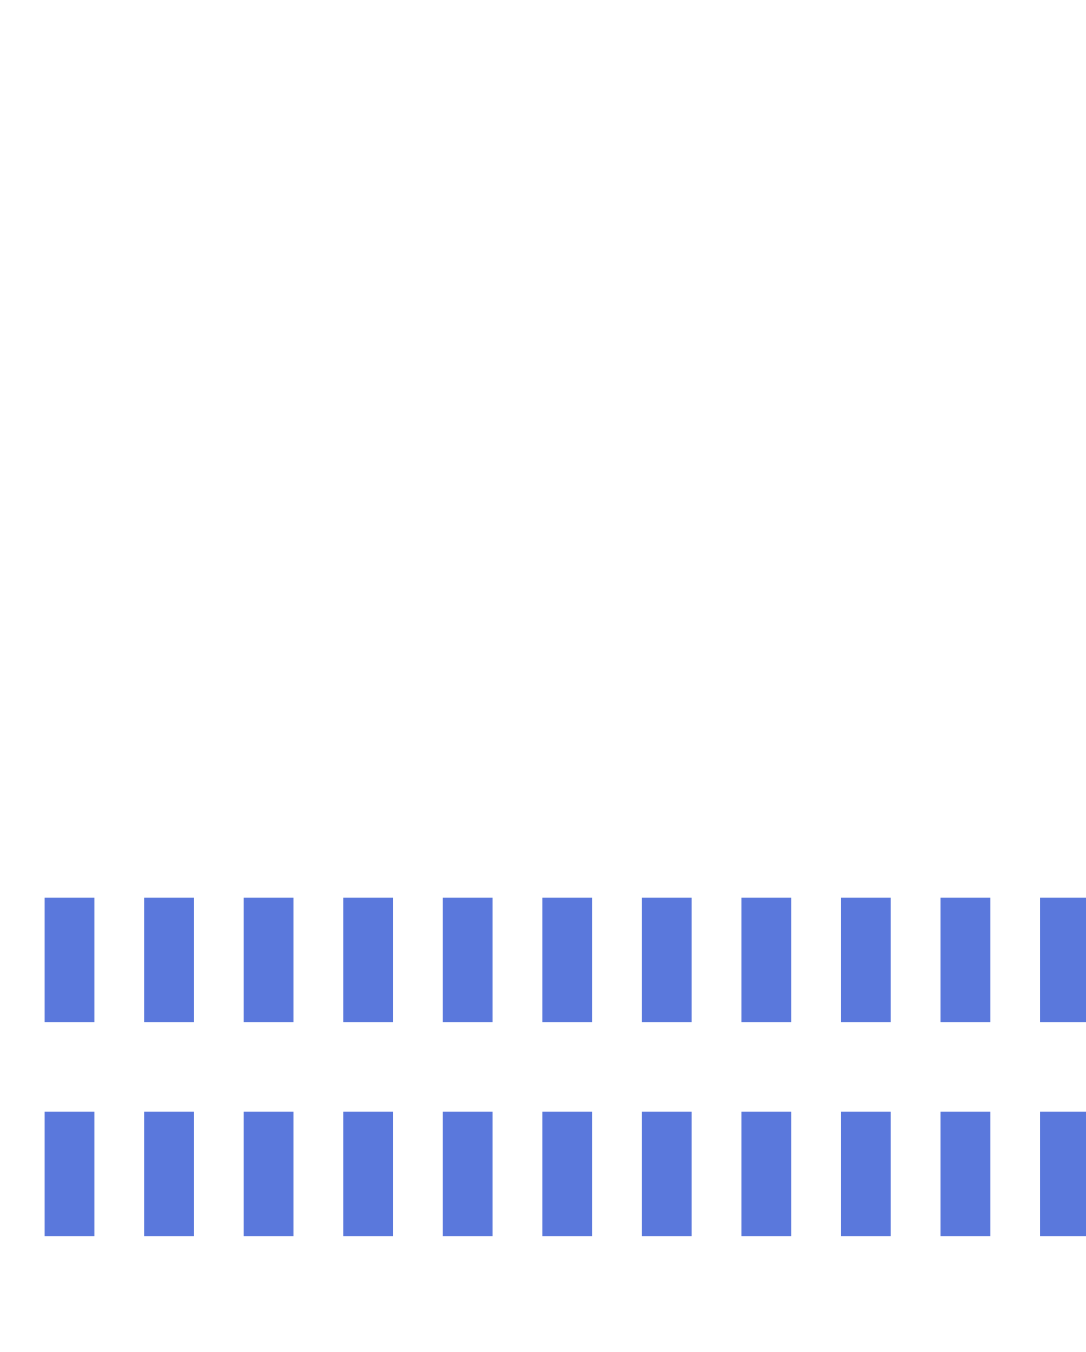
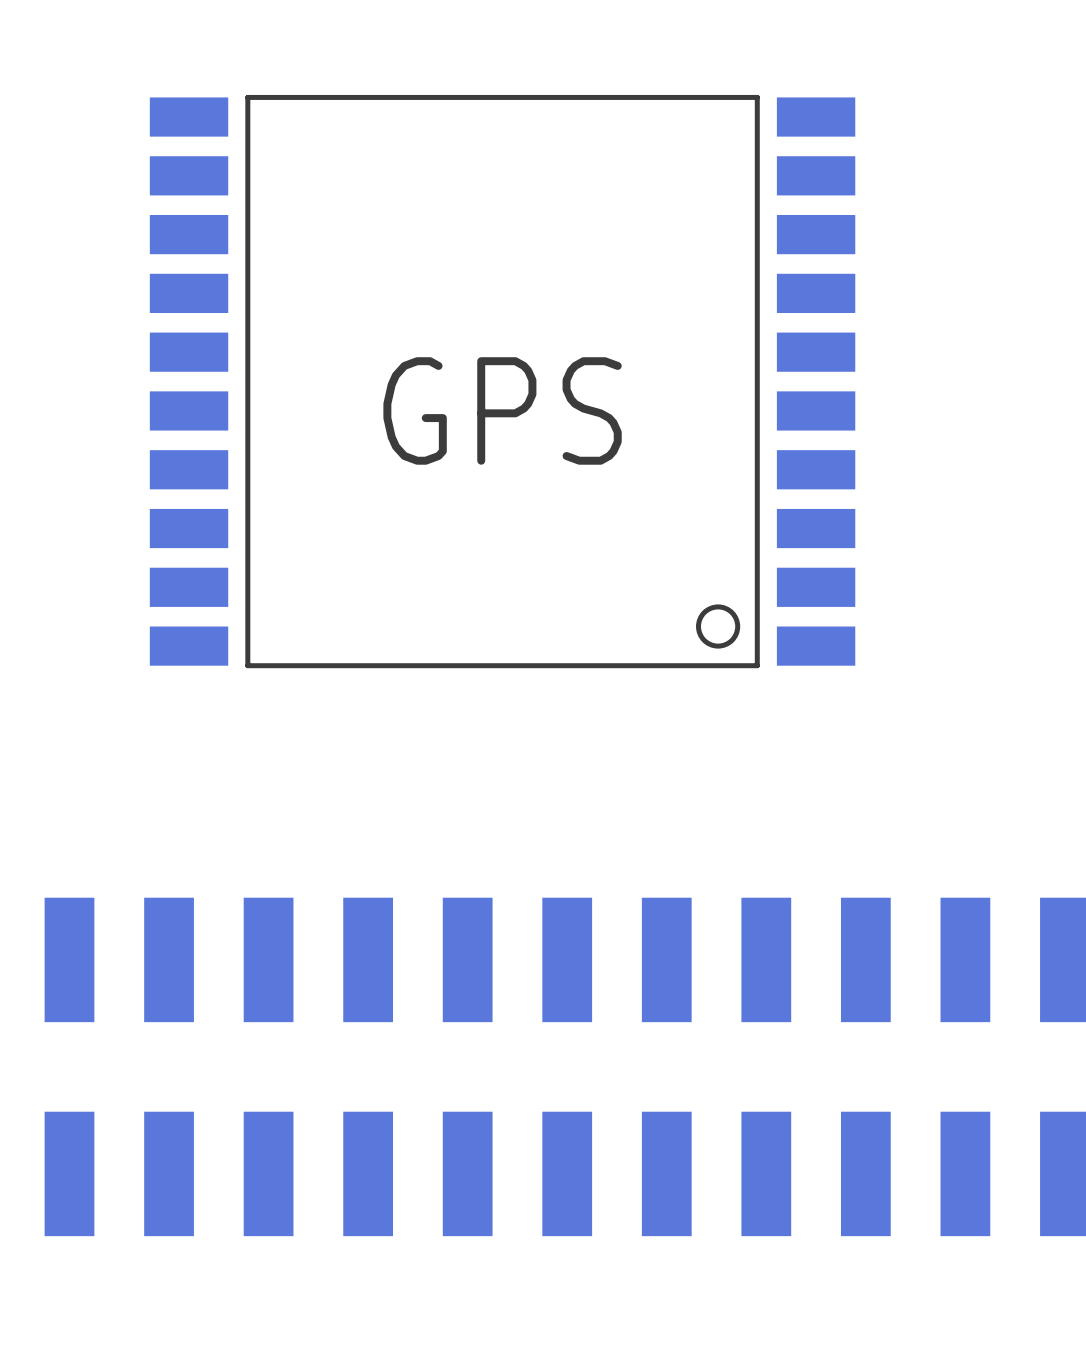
part: none -> (502, 381)

